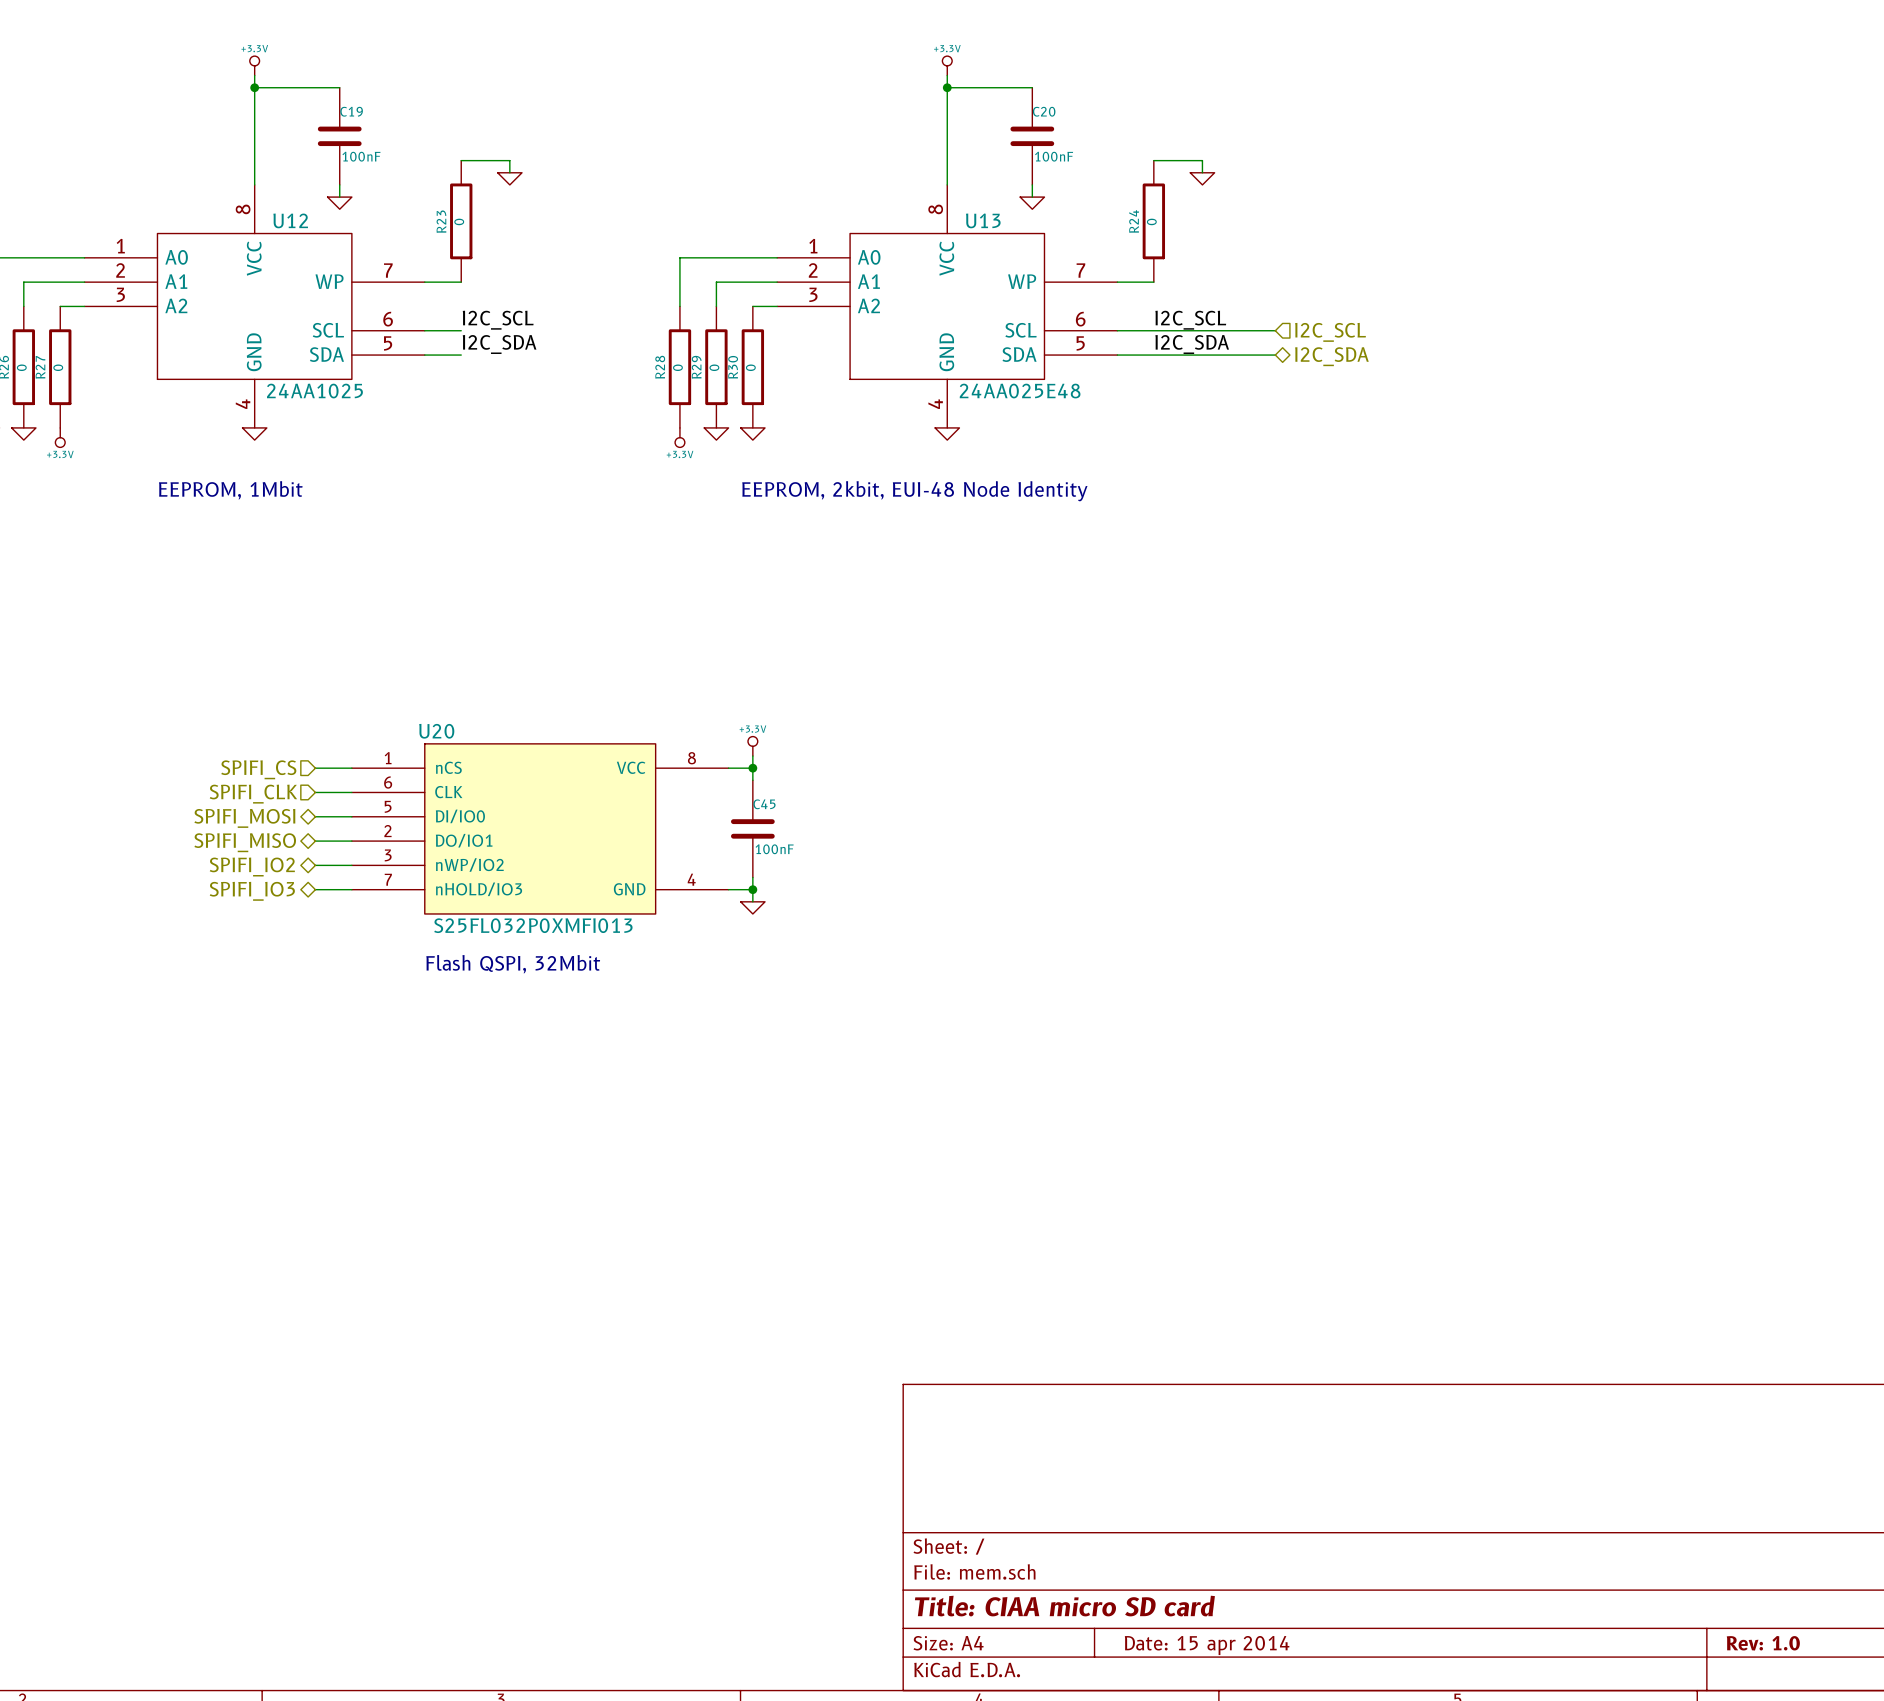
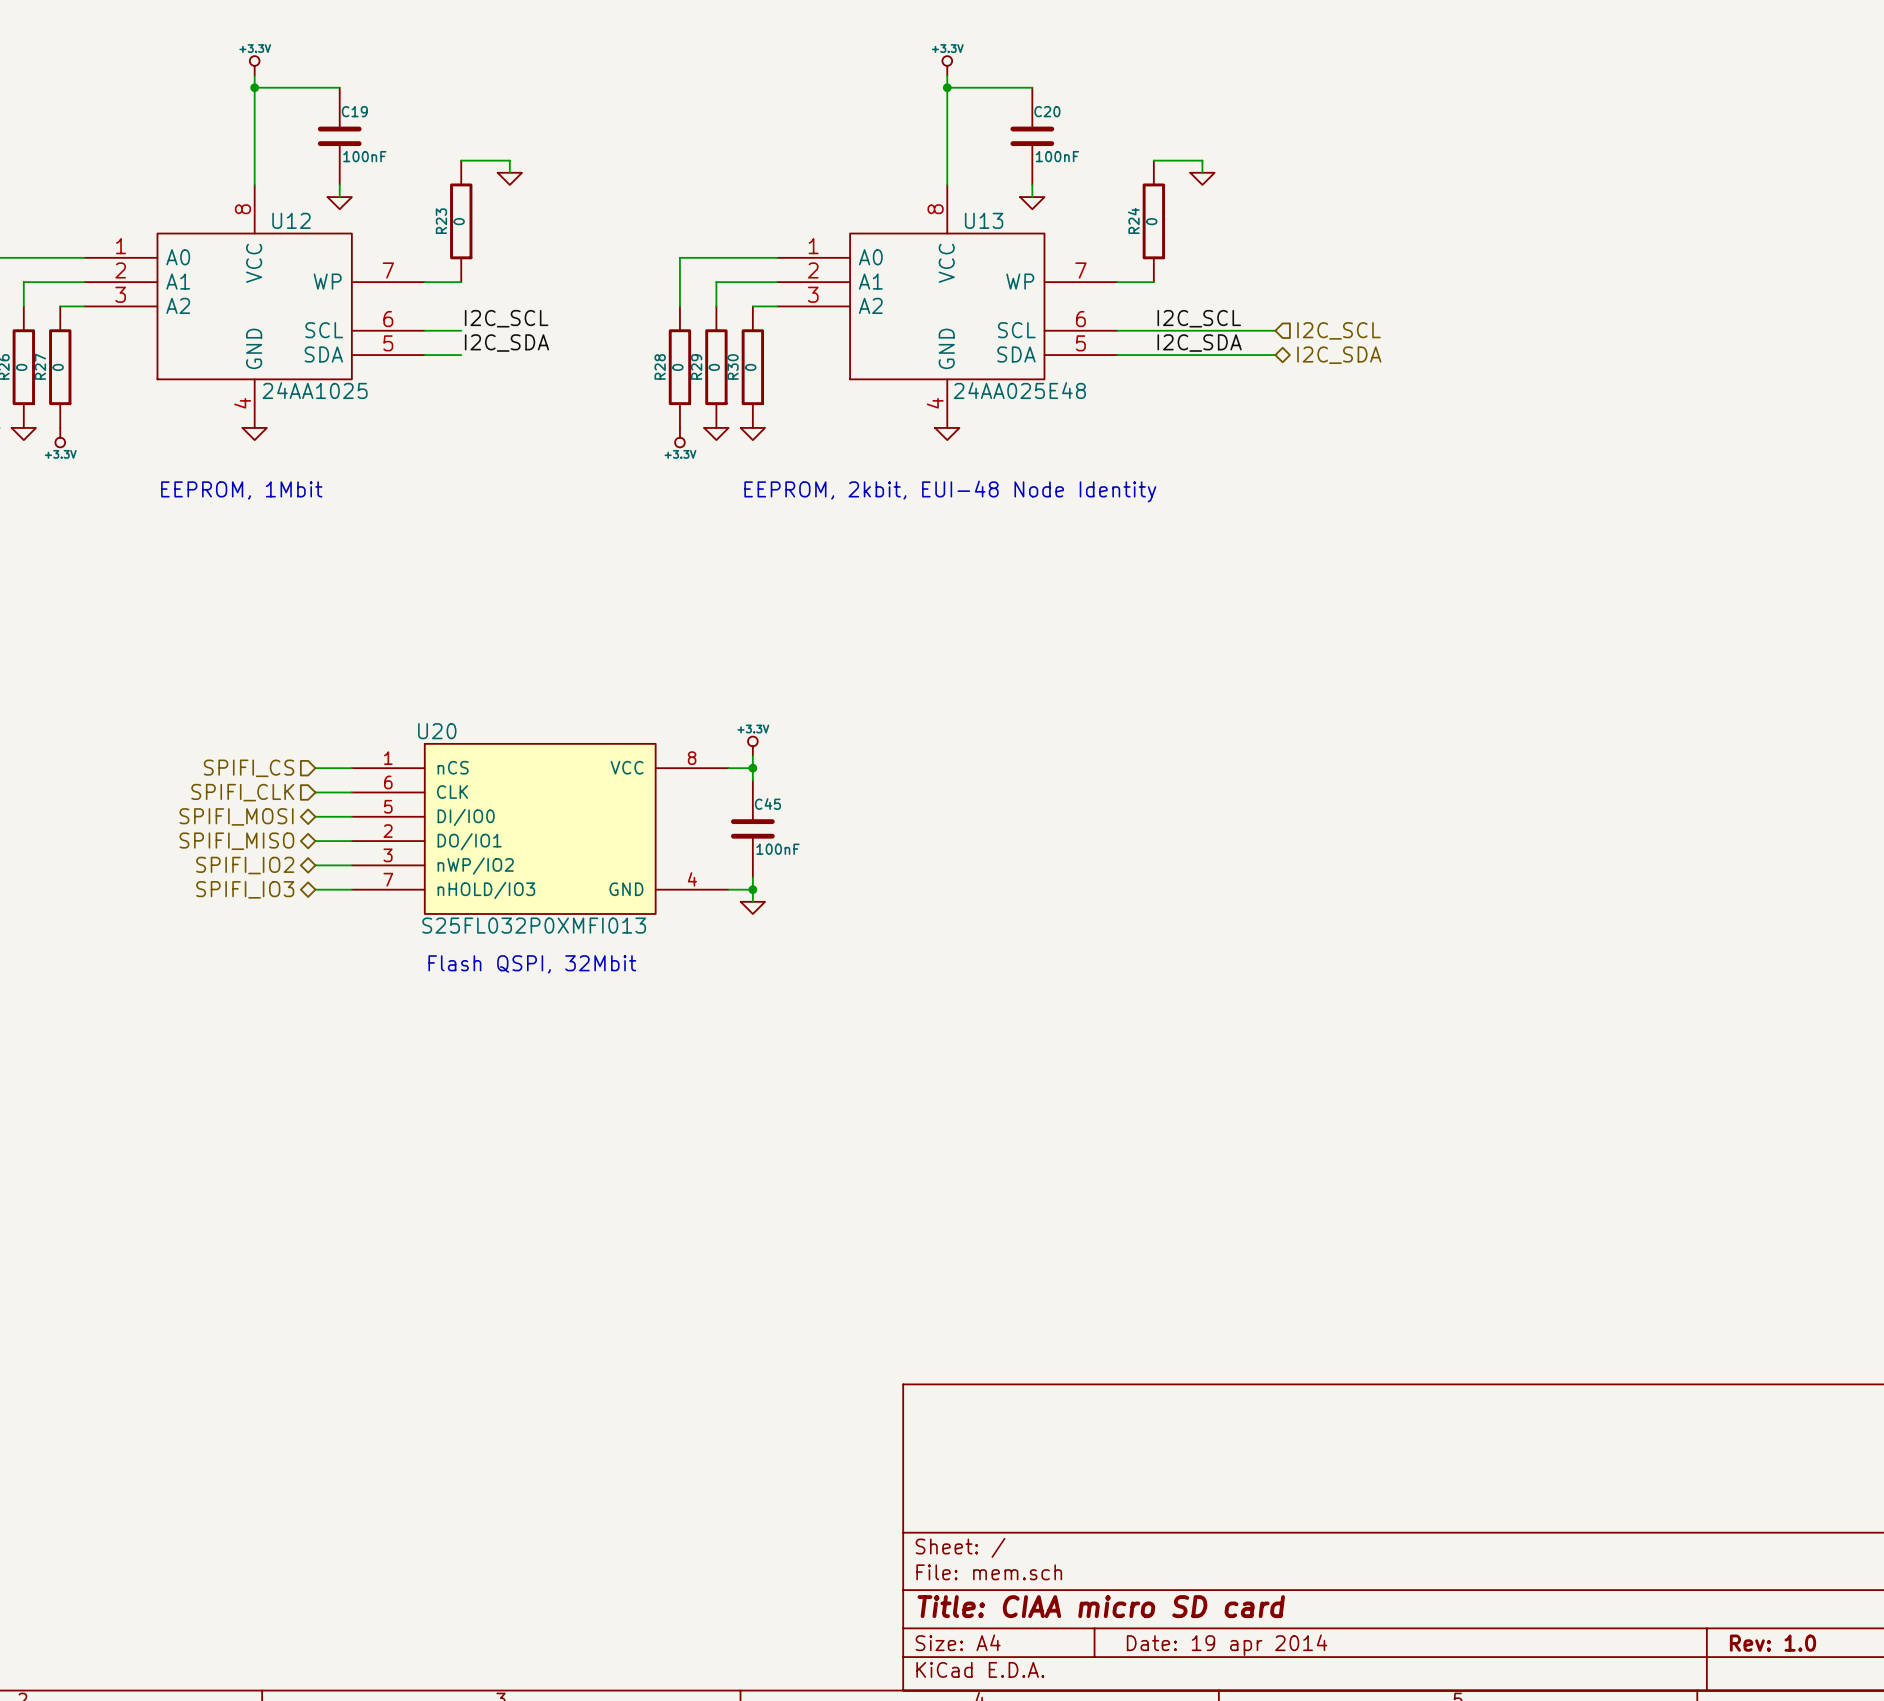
title block: Date: 15 apr 2014 (1207, 1645) -> Date: 19 apr 2014 (1227, 1645)

